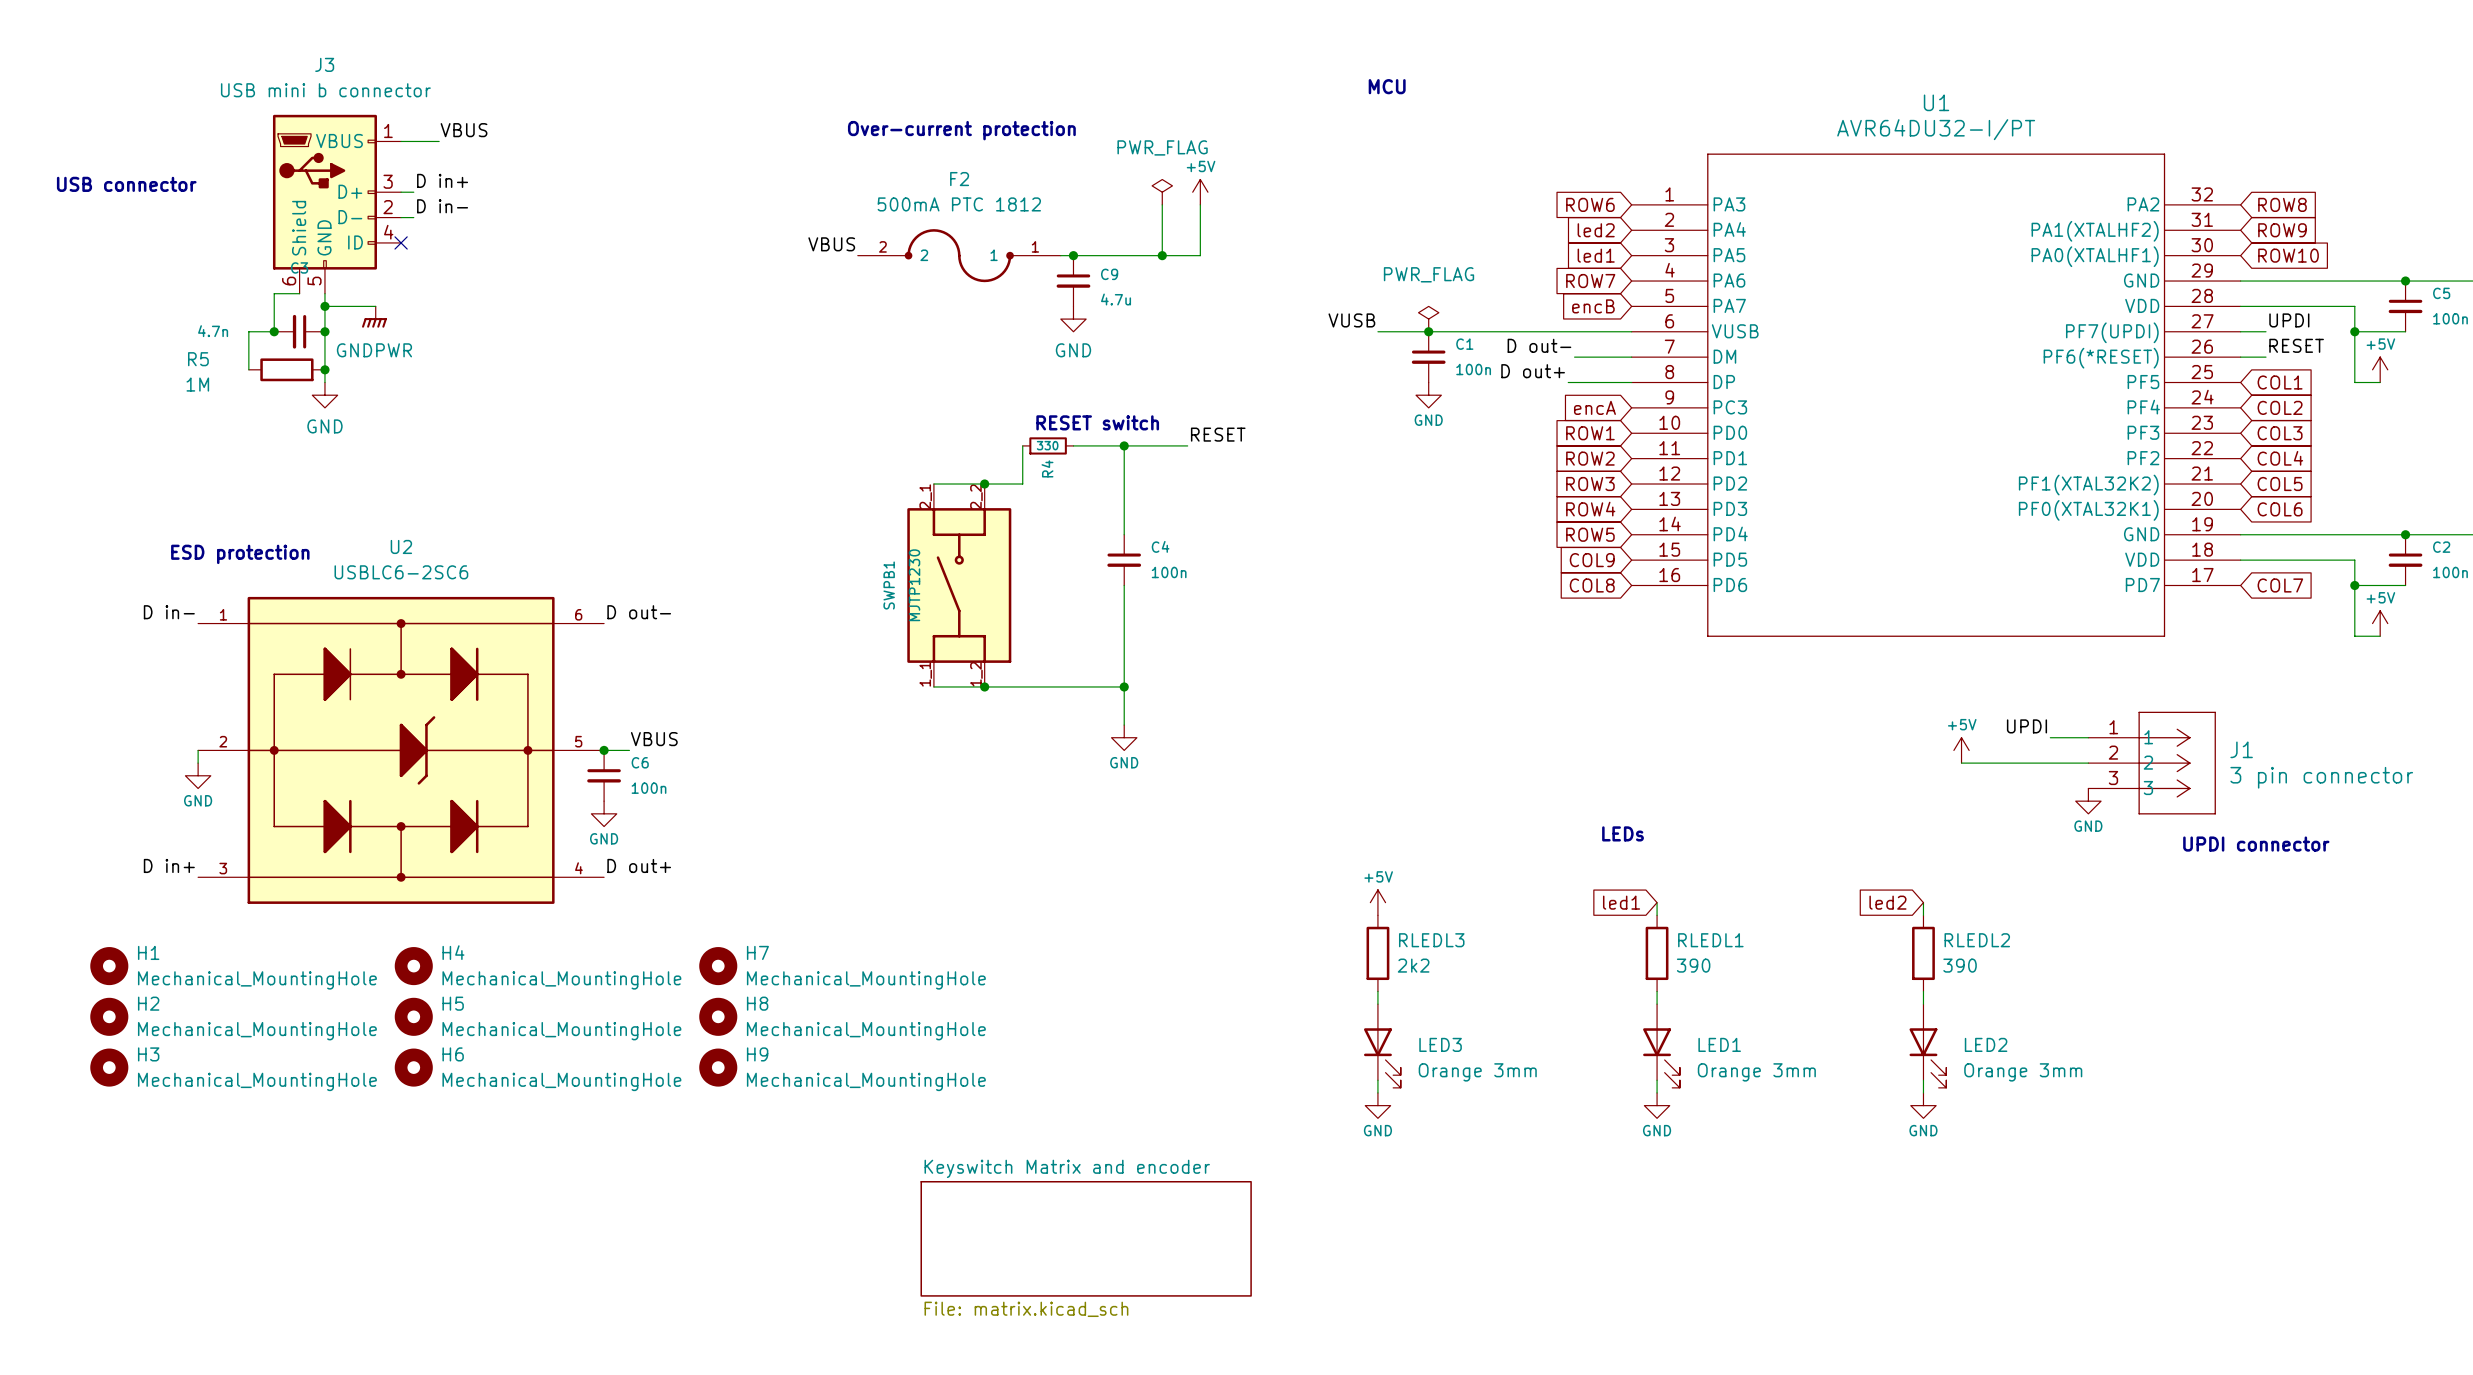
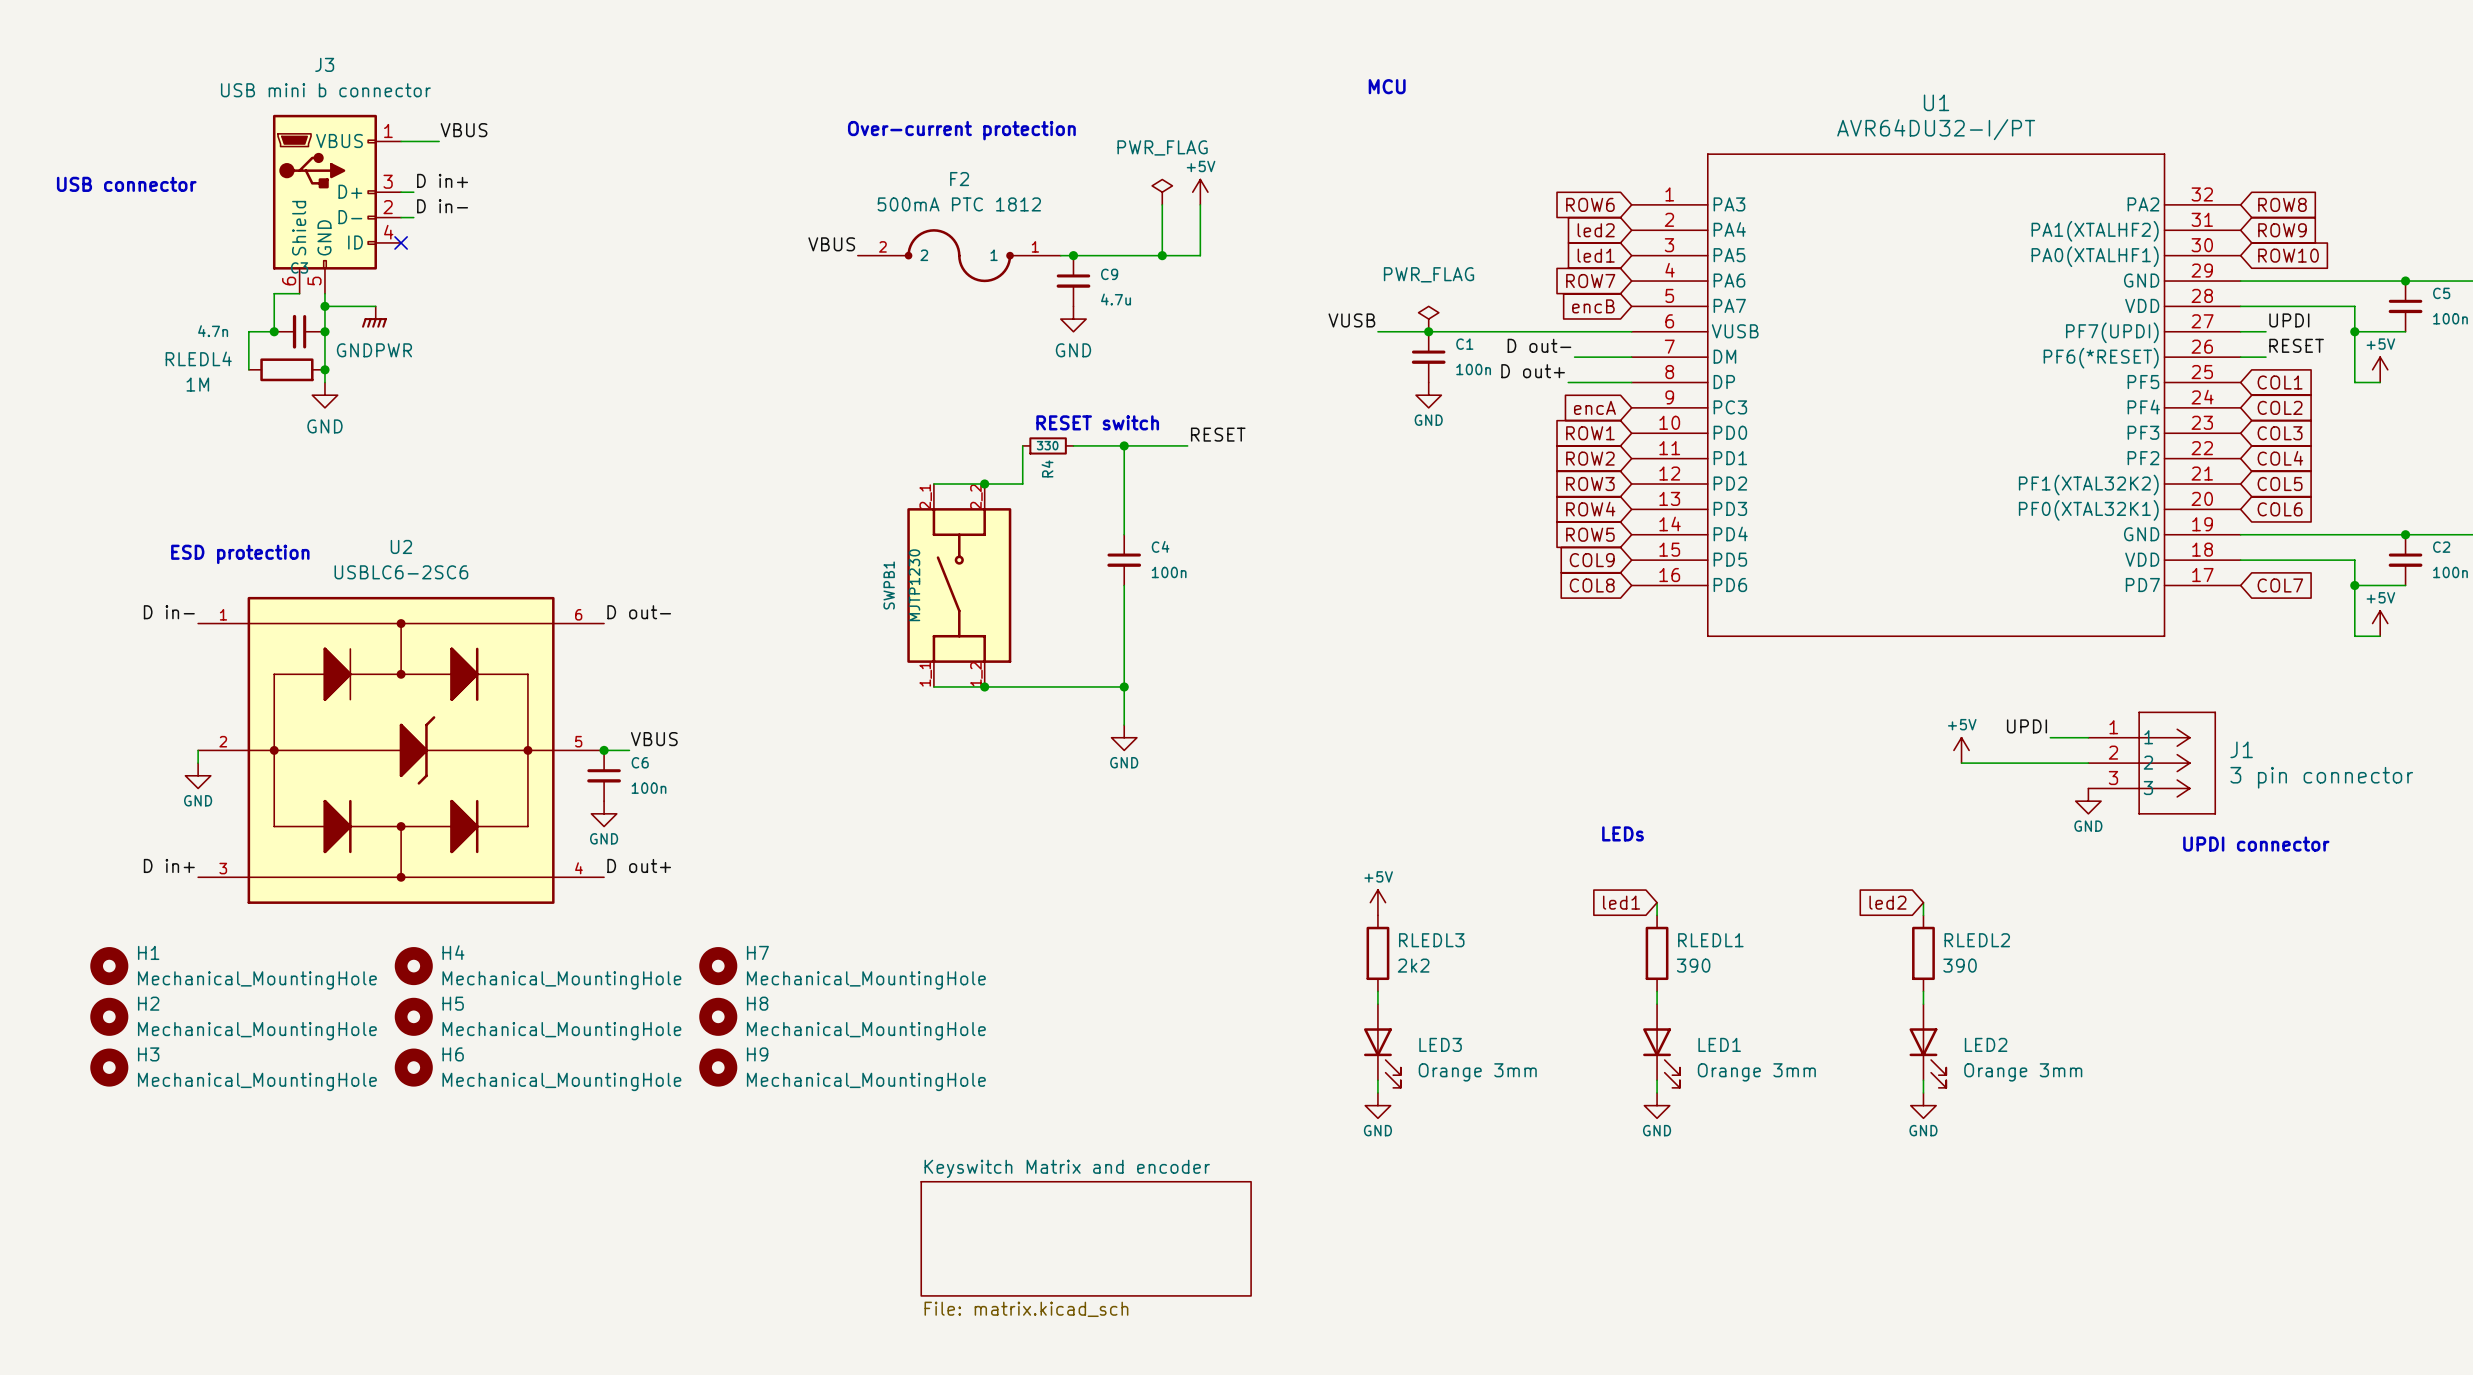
R5 name: R5 (198, 359) -> RLEDL4 (198, 358)

